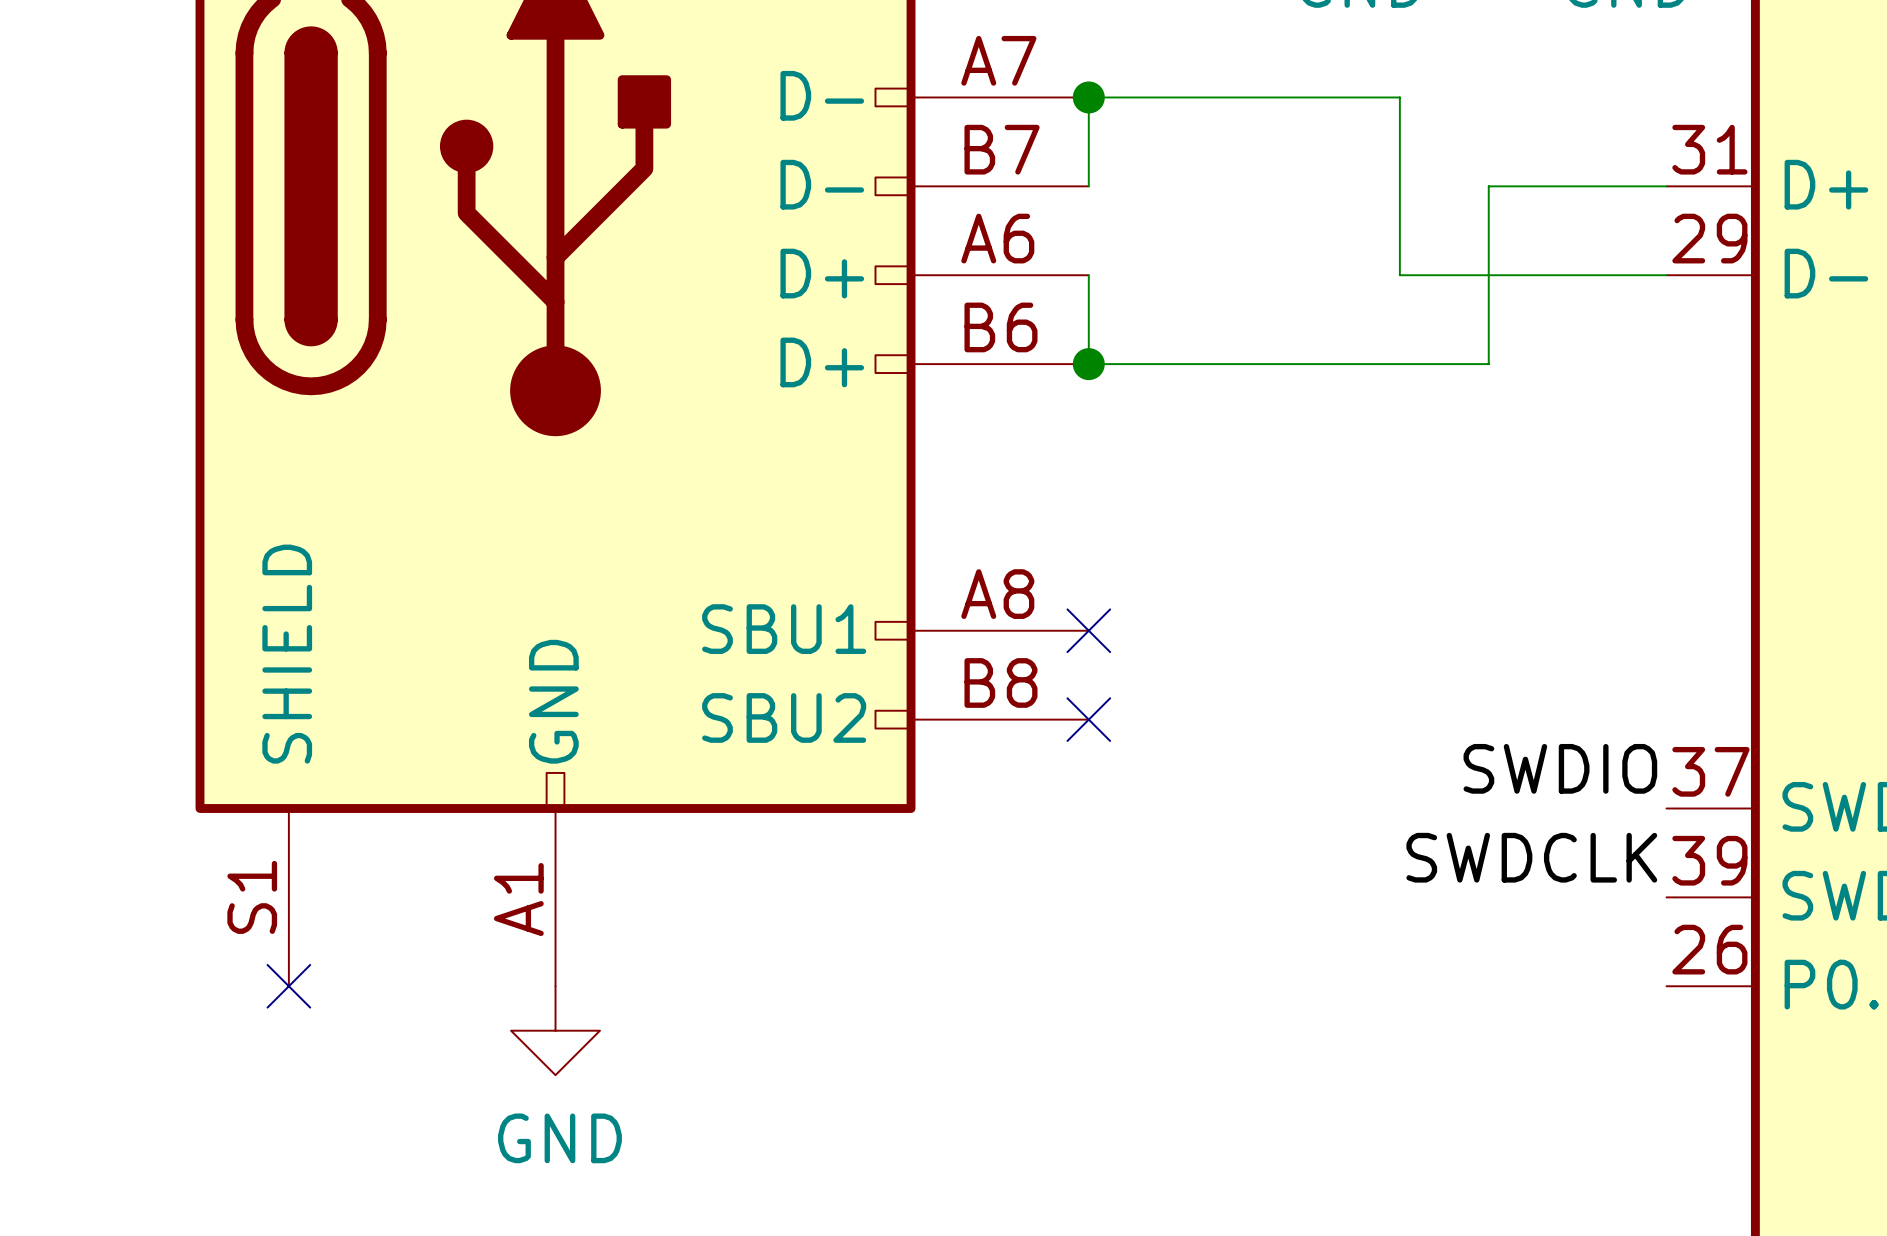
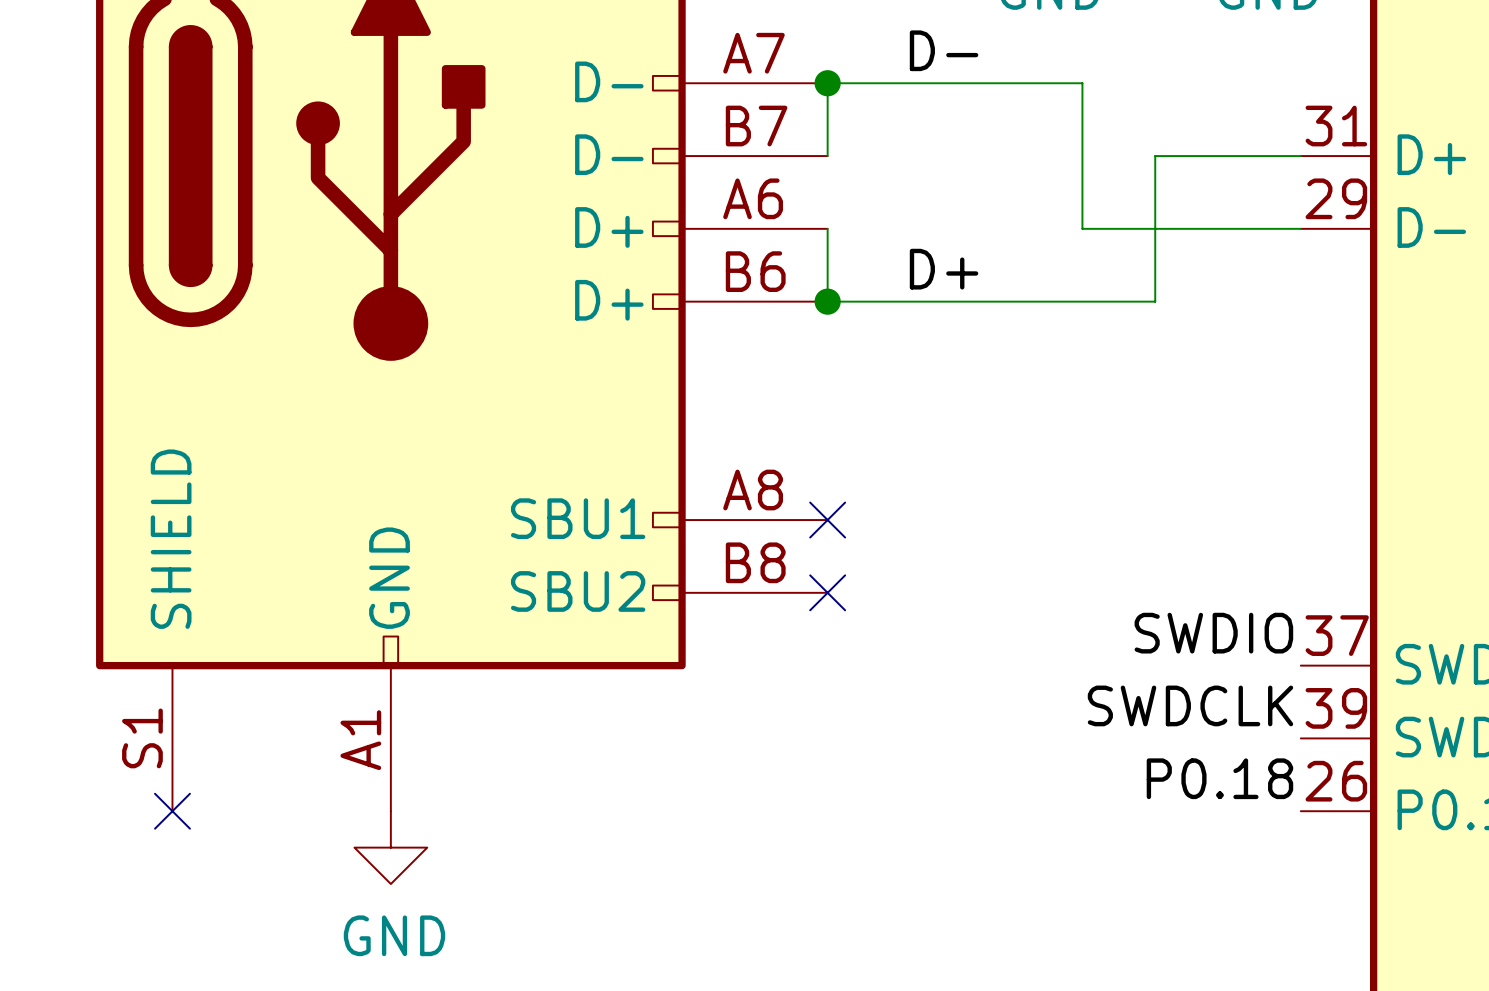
label: none -> D- (944, 50)
label: none -> D+ (944, 269)
label: none -> P0.18 (1219, 778)

